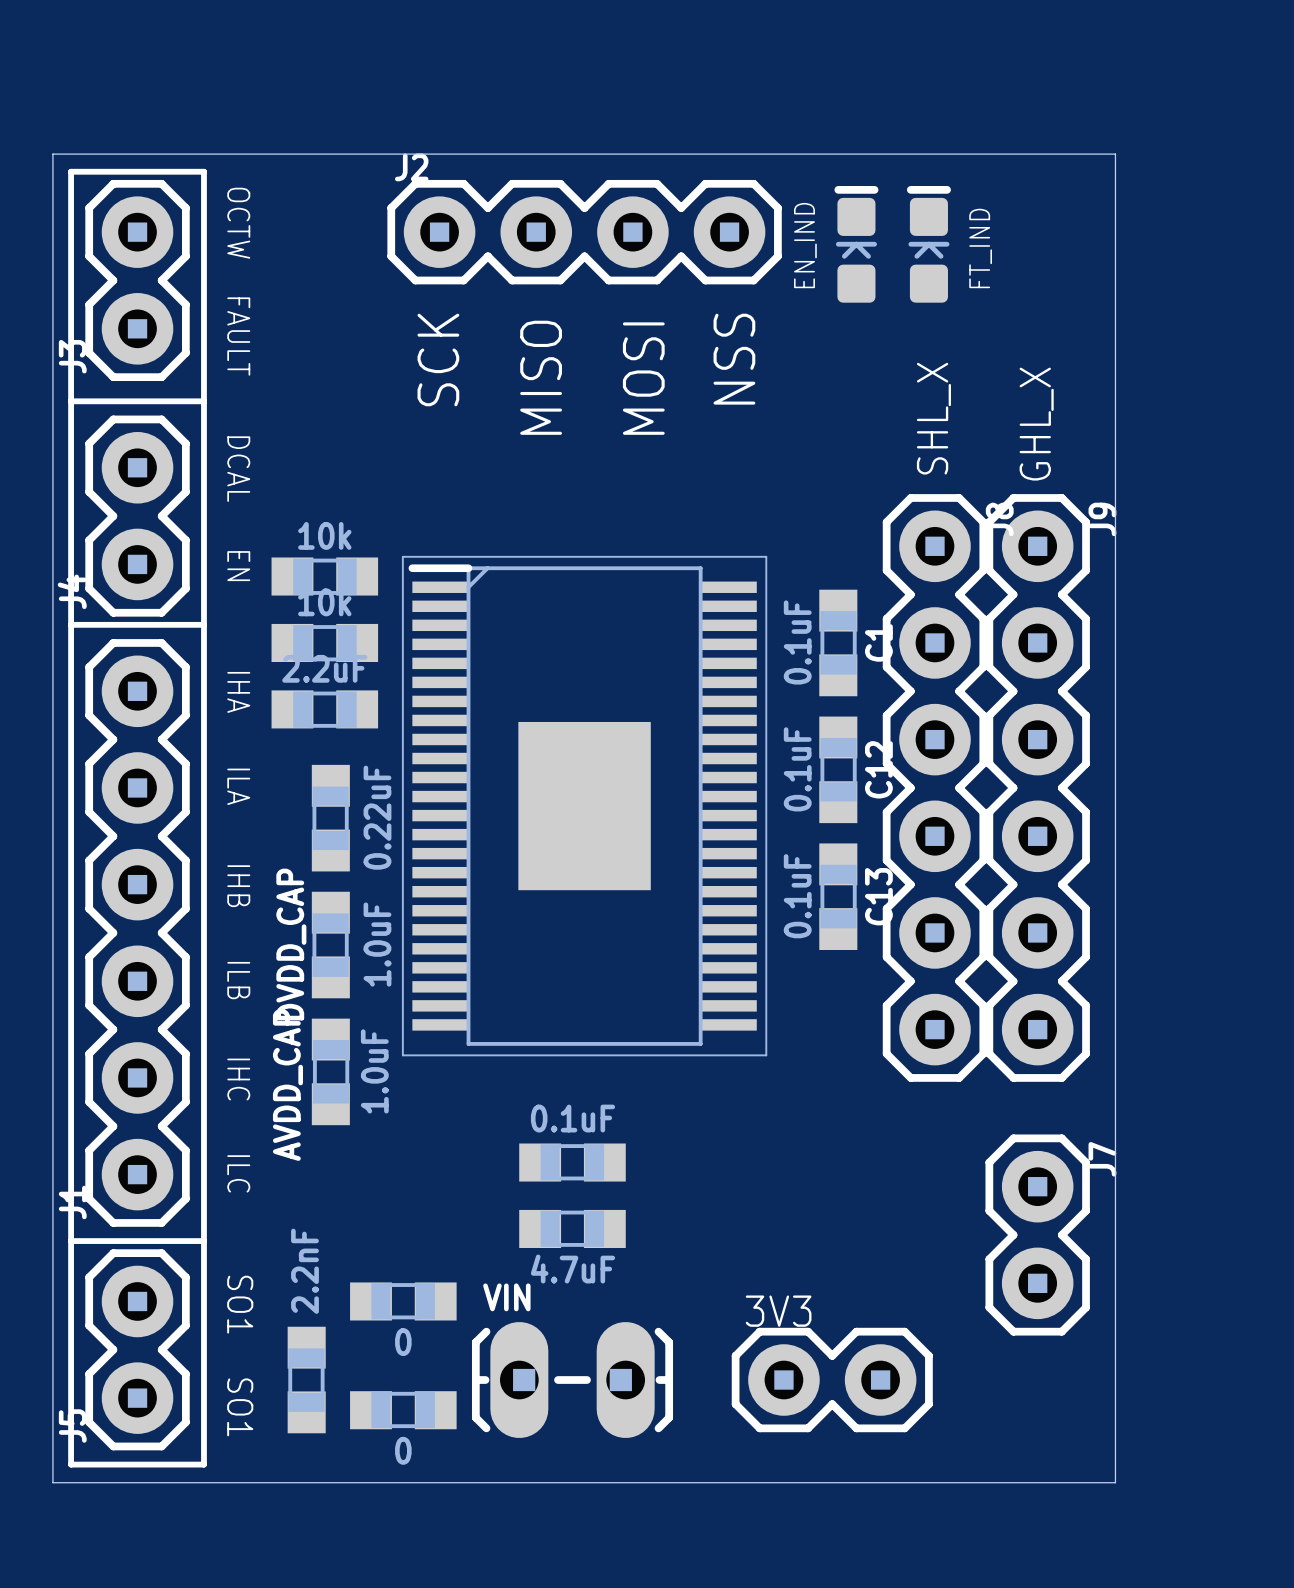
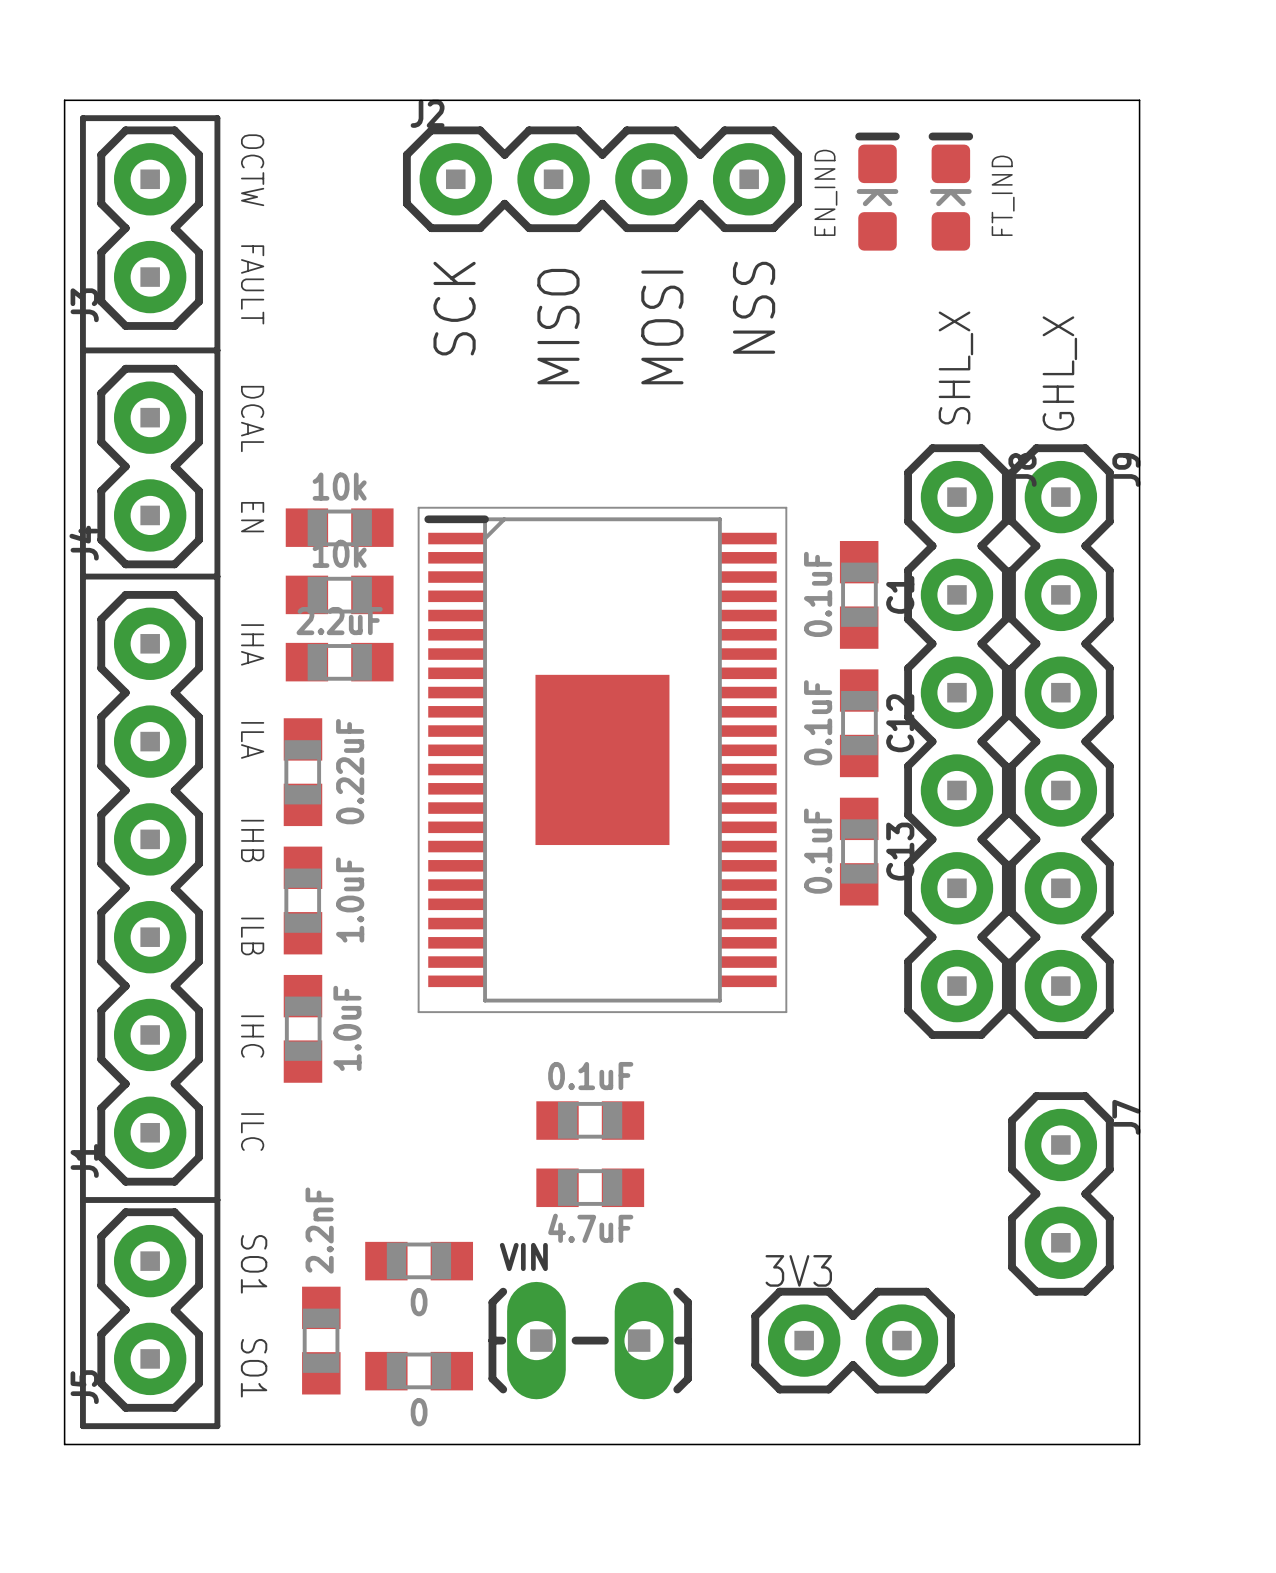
part position: (330, 818) -> (302, 772)
part: none -> 1.0uF (302, 900)
DVDD_CAP: 1.0uF (330, 945) -> none
part: none -> 1.0uF (302, 1028)
AVDD_CAP: 1.0uF (330, 1071) -> none

